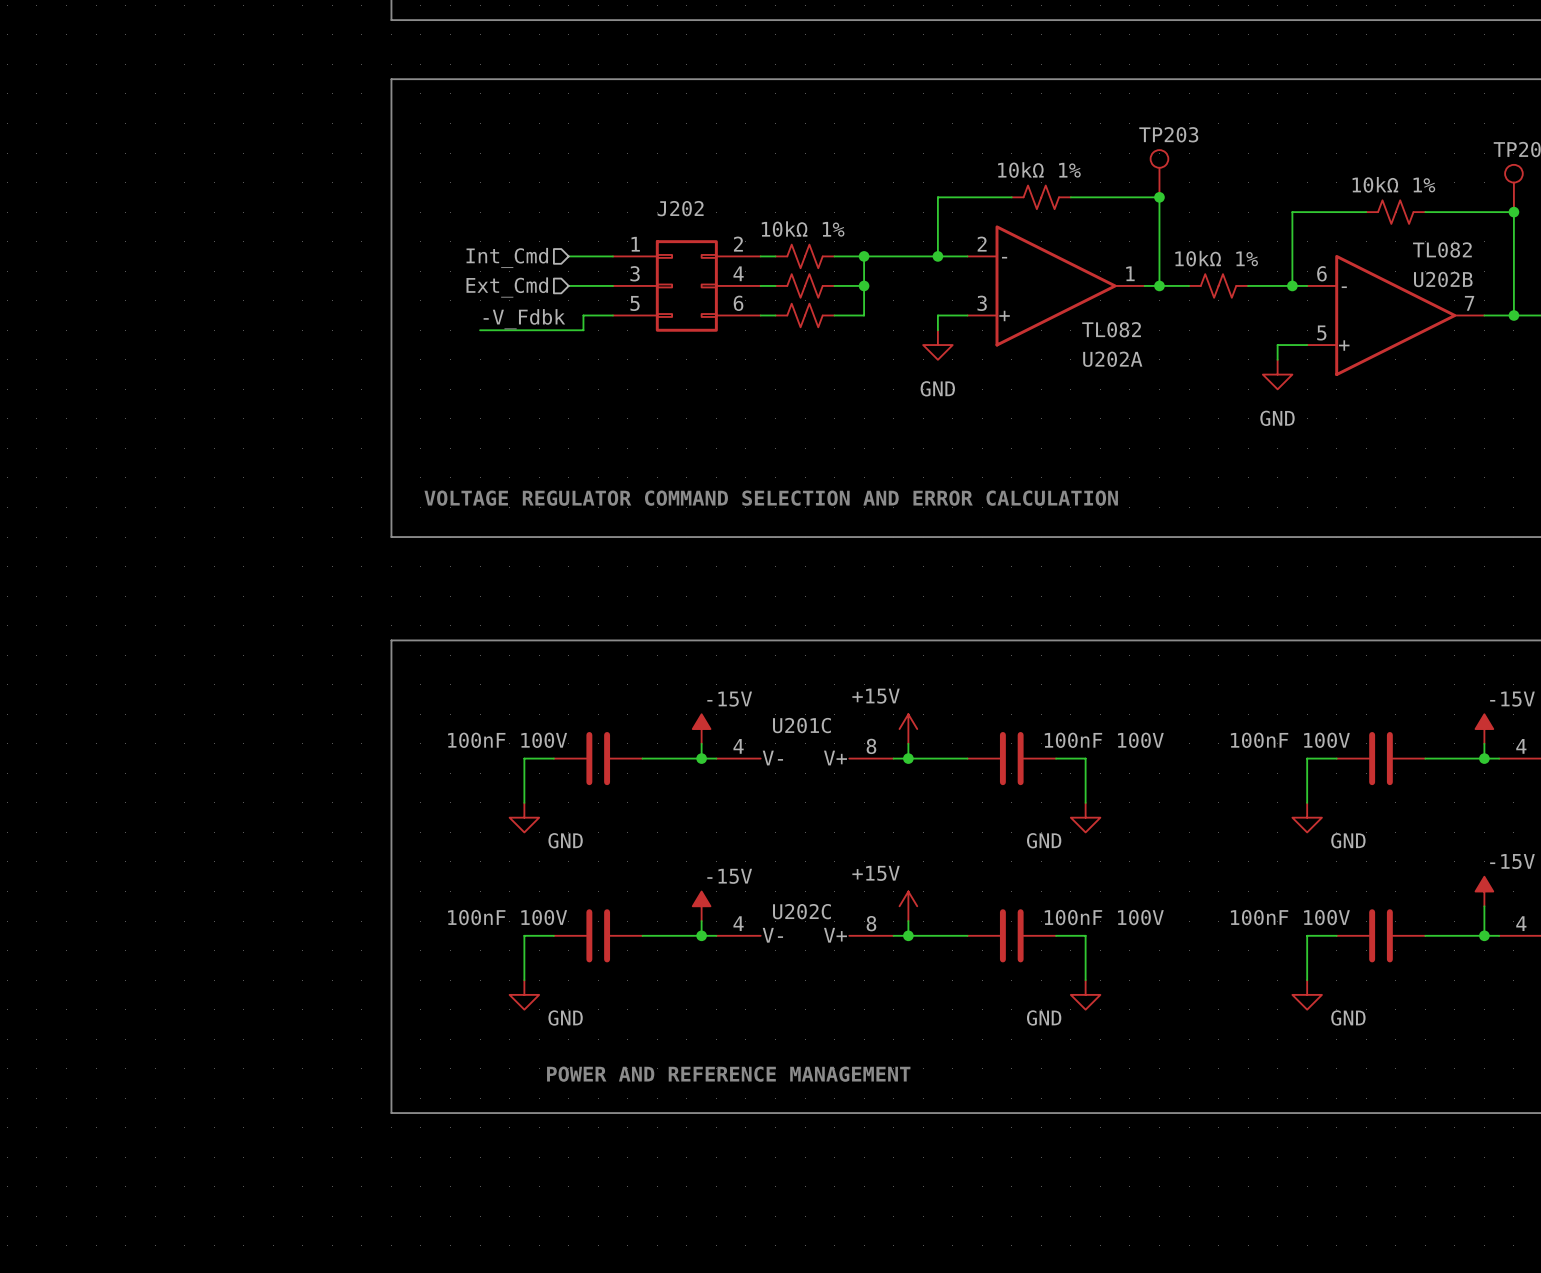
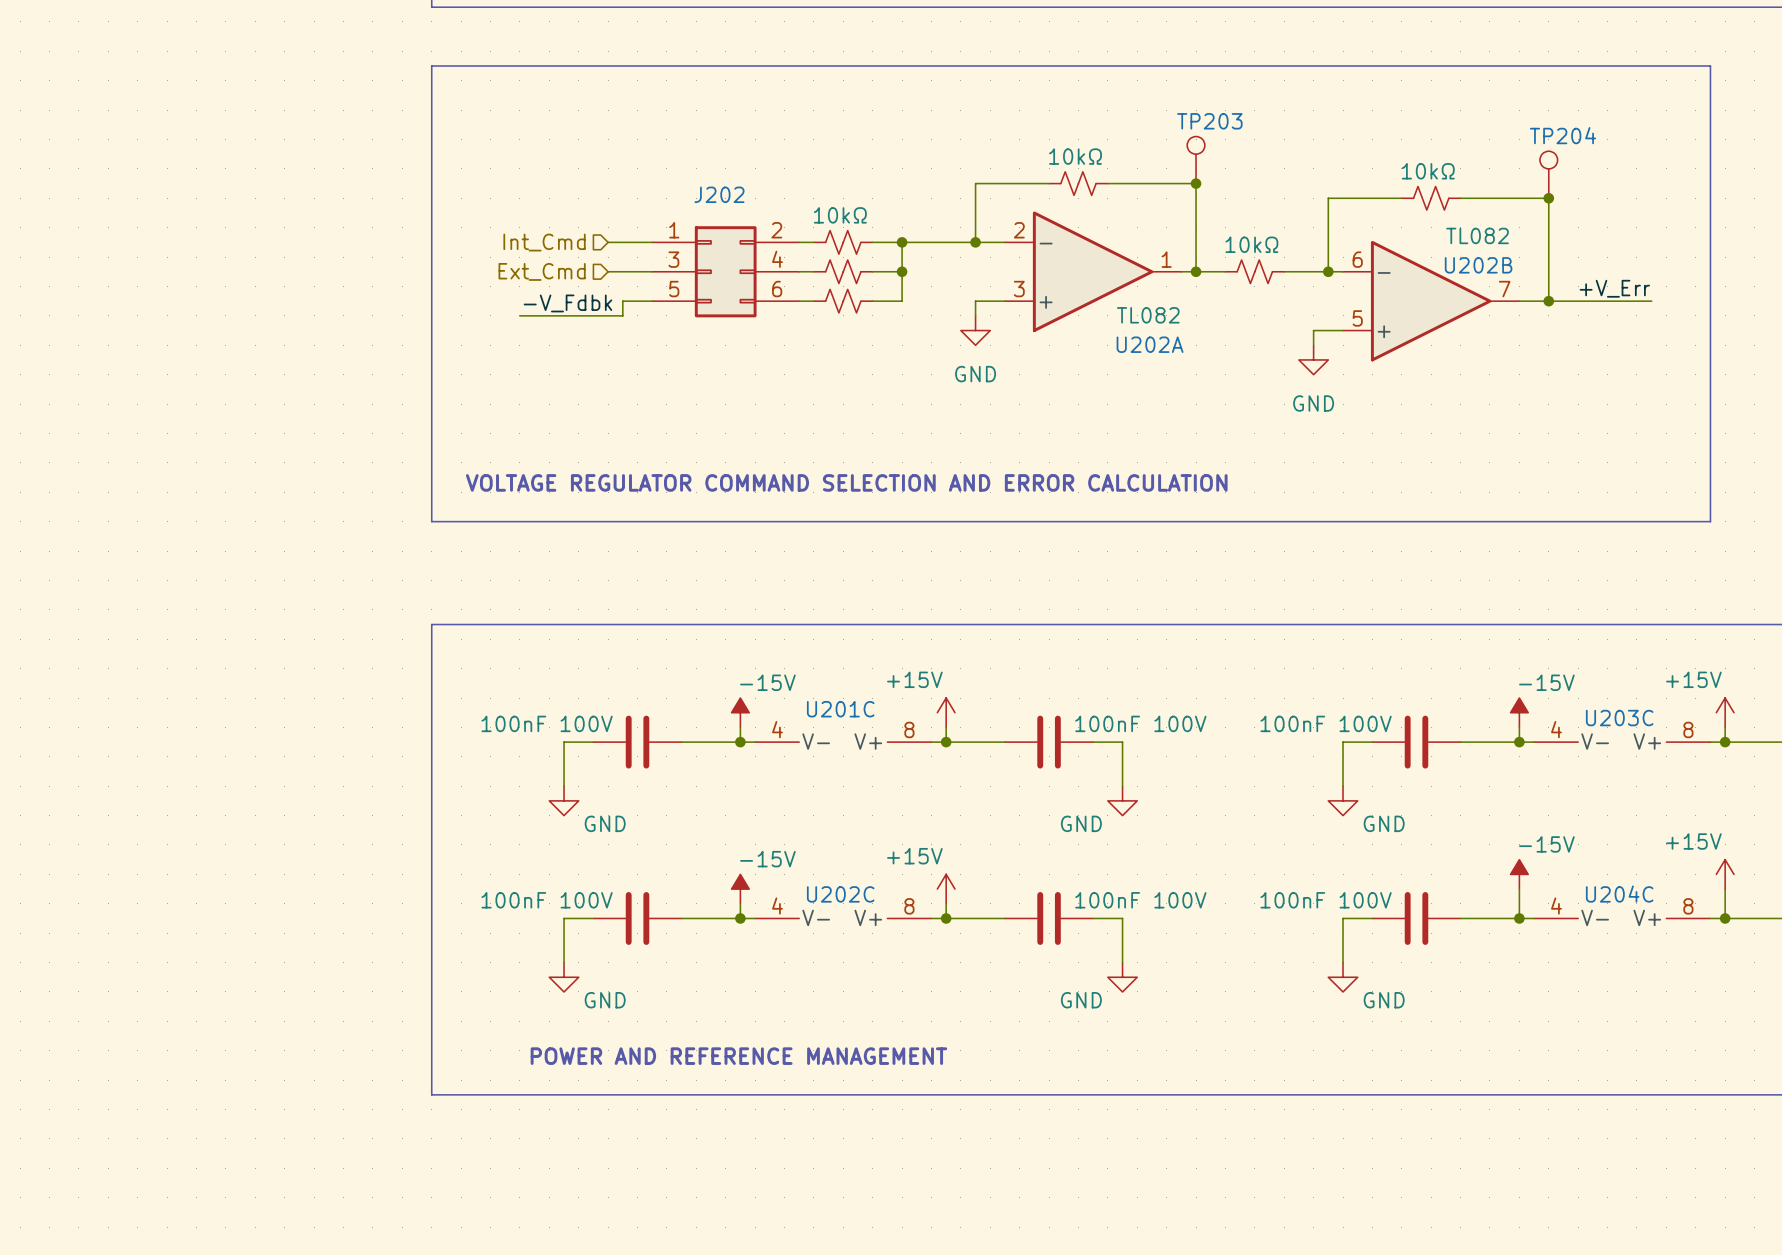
part value: 10kΩ 1% (1039, 170) -> 10kΩ (1075, 156)
part value: 10kΩ 1% (1393, 184) -> 10kΩ (1428, 171)
part value: 10kΩ 1% (803, 229) -> 10kΩ (840, 215)
part value: 10kΩ 1% (1216, 258) -> 10kΩ (1251, 244)

